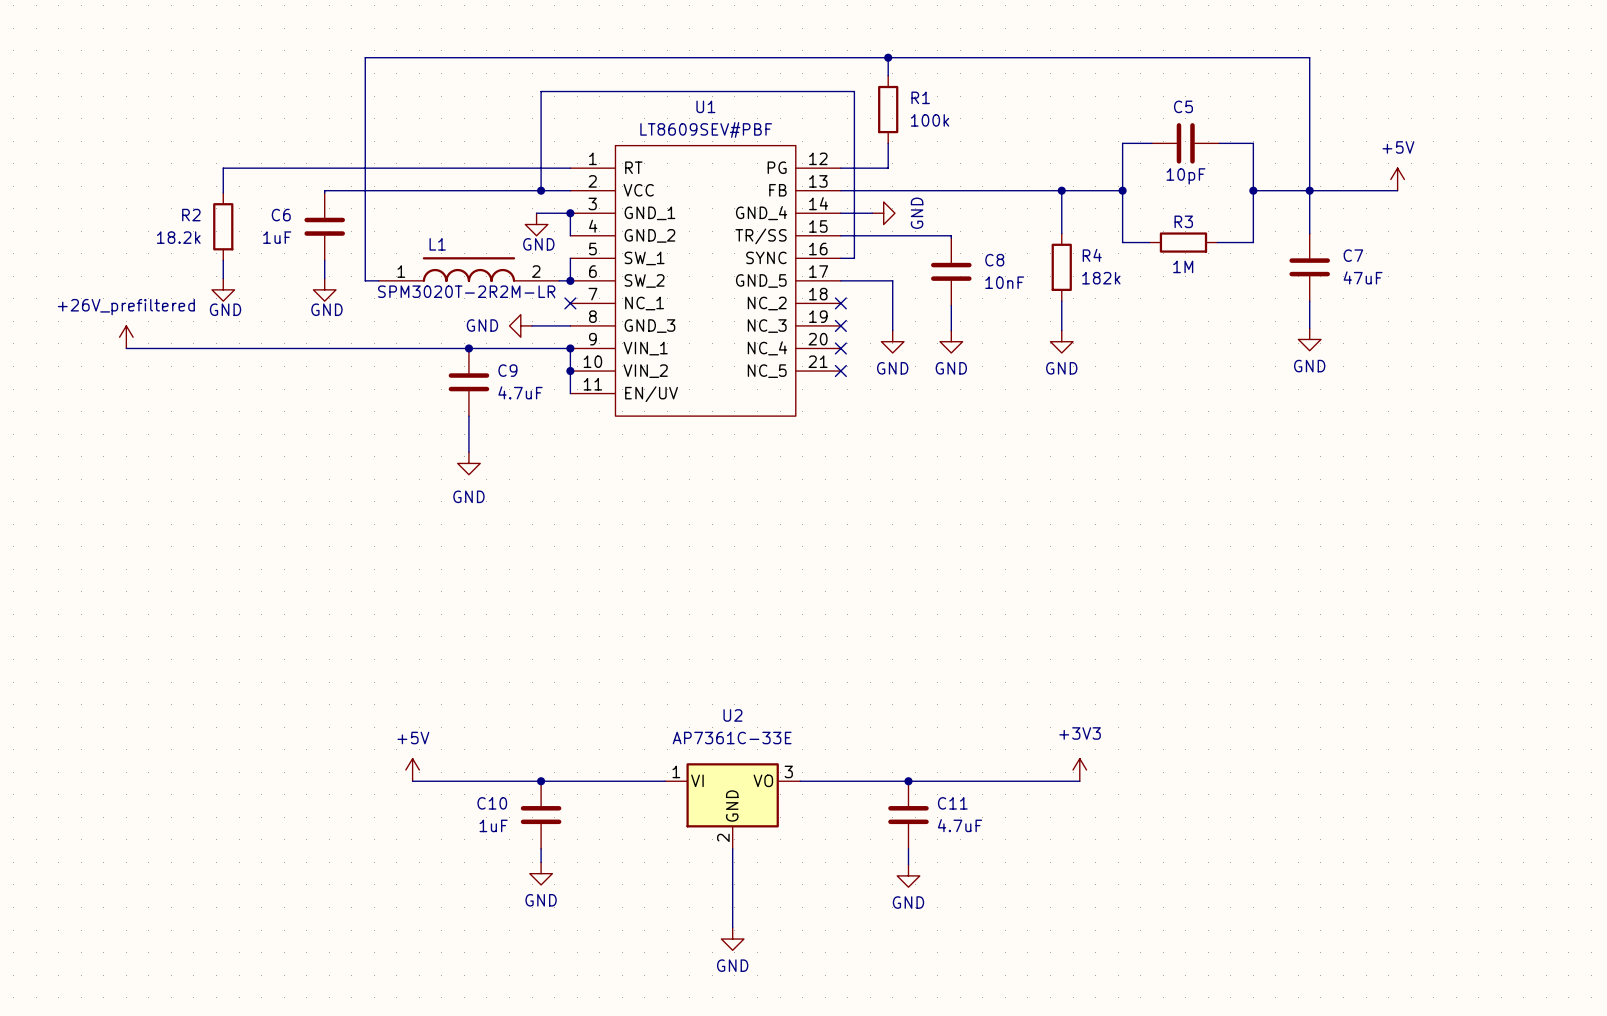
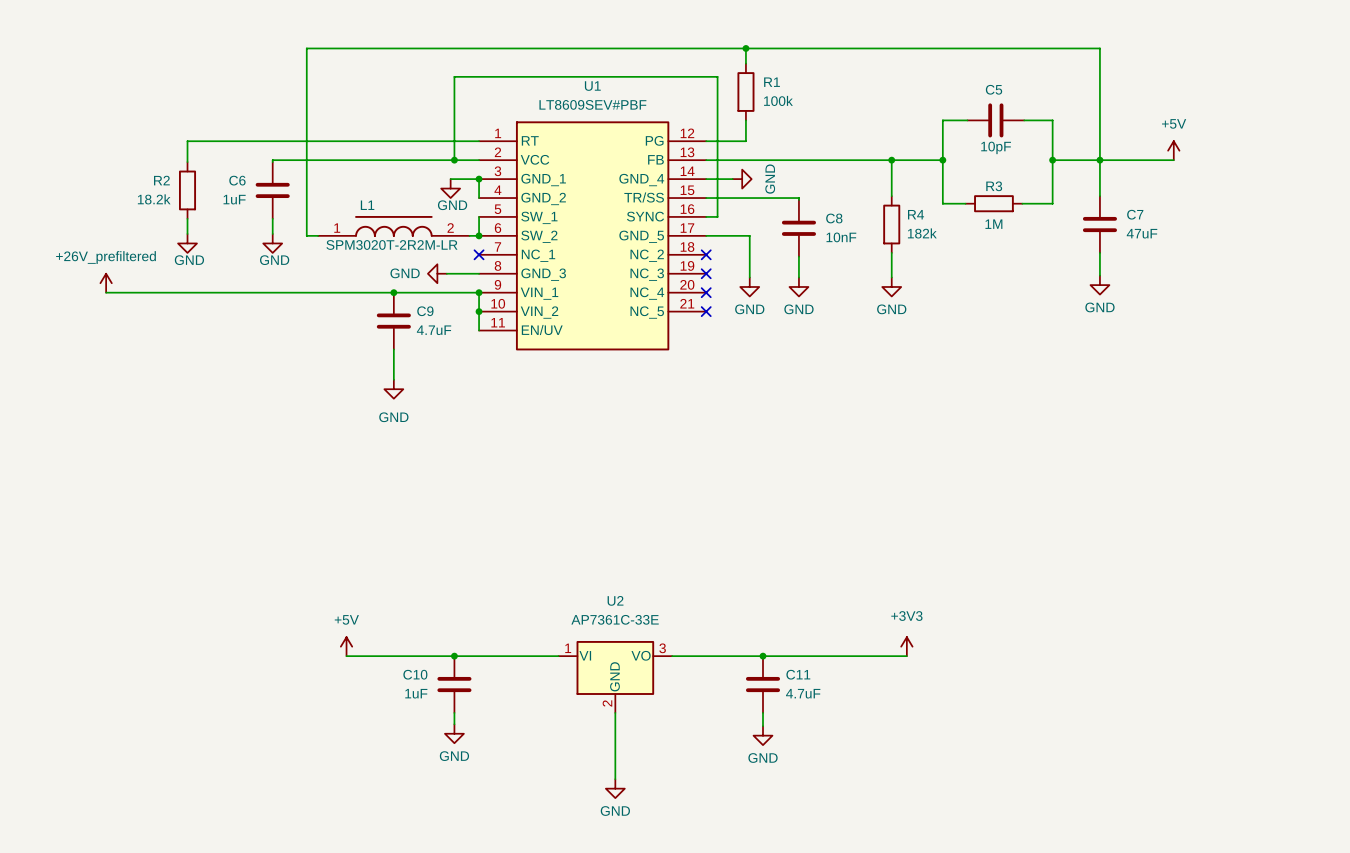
U1 symbol: [570, 144, 841, 417] -> [479, 121, 707, 351]

